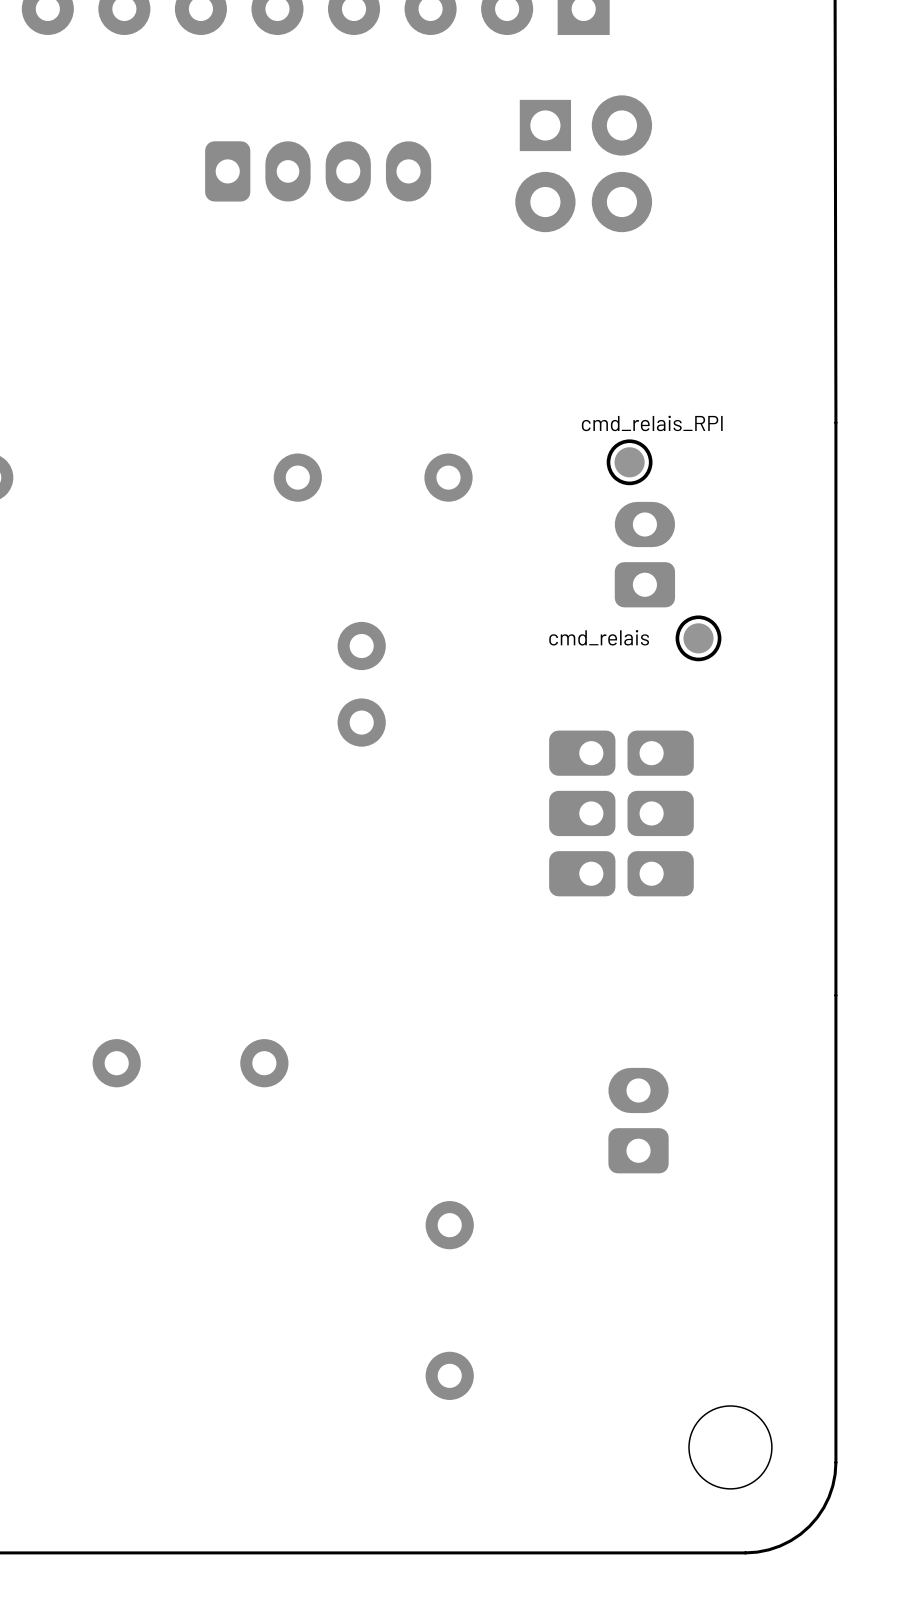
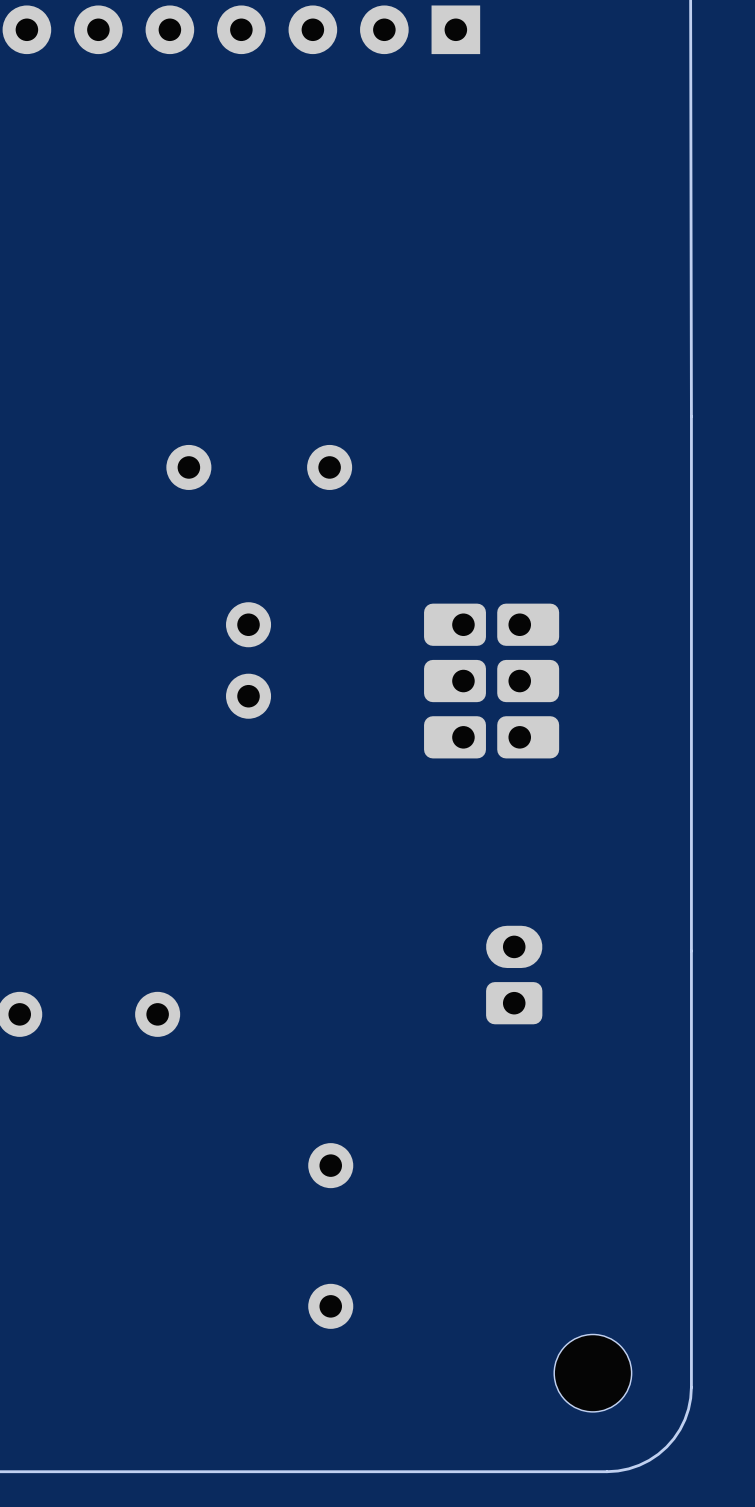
part: (583, 163) -> none
part: (318, 171) -> none
text: cmd_relais_RPI (652, 423) -> none
part: (629, 462) -> none
part: (644, 554) -> none
text: cmd_relais (599, 637) -> none
part: (698, 638) -> none
part position: (621, 813) -> (491, 681)
part position: (638, 1120) -> (514, 975)

